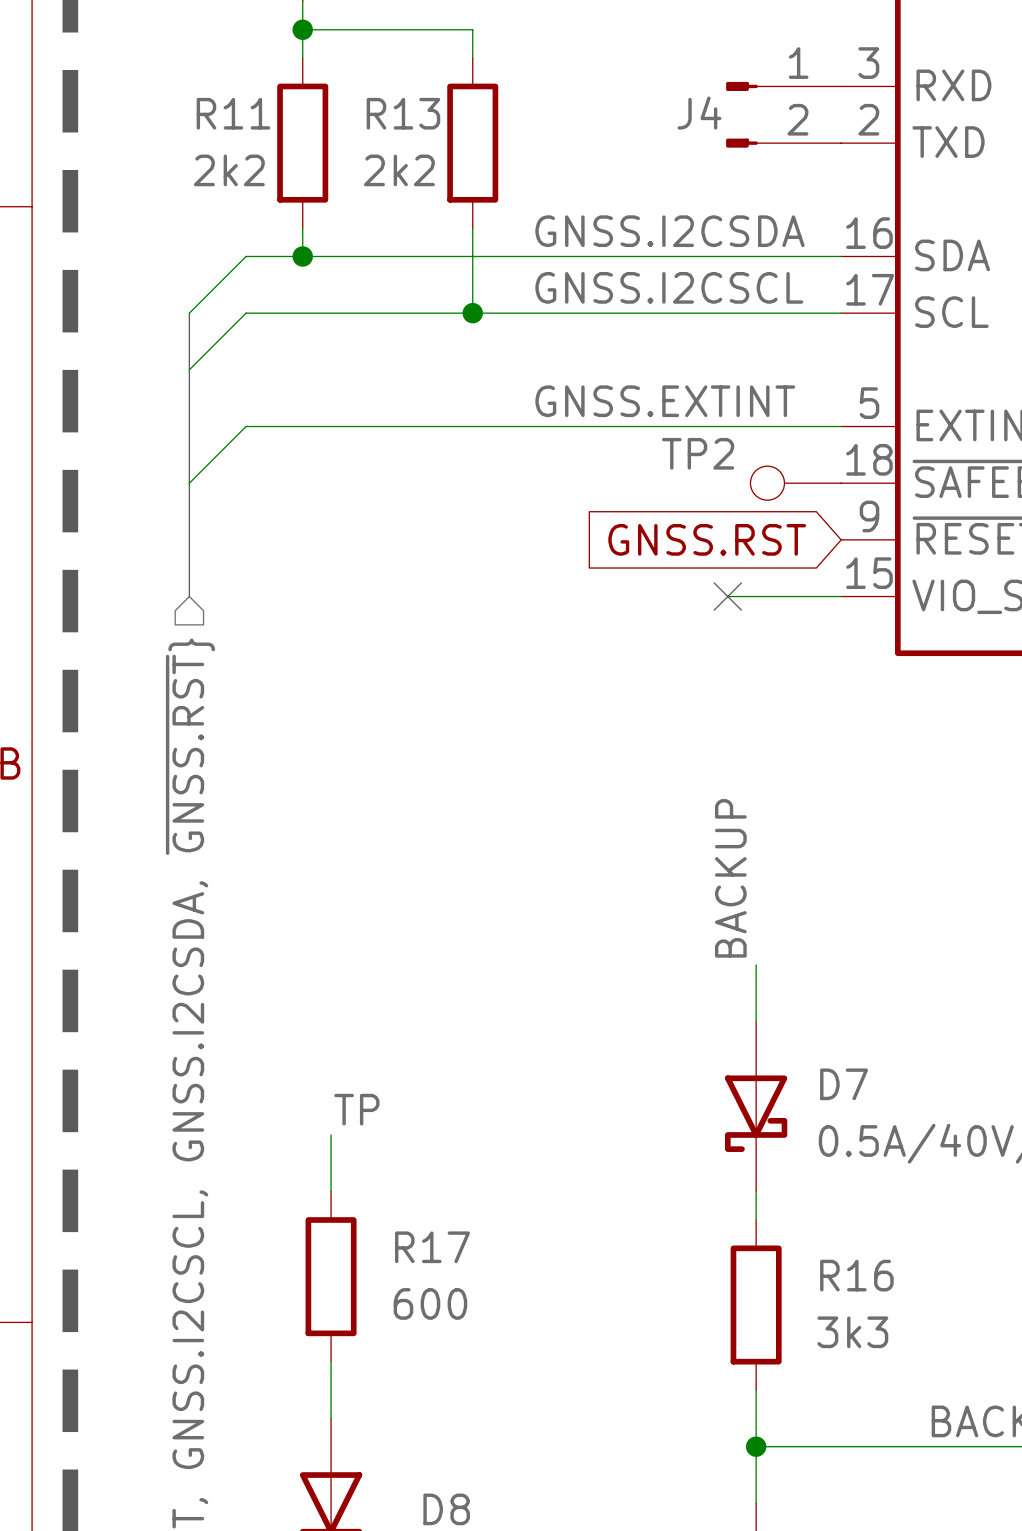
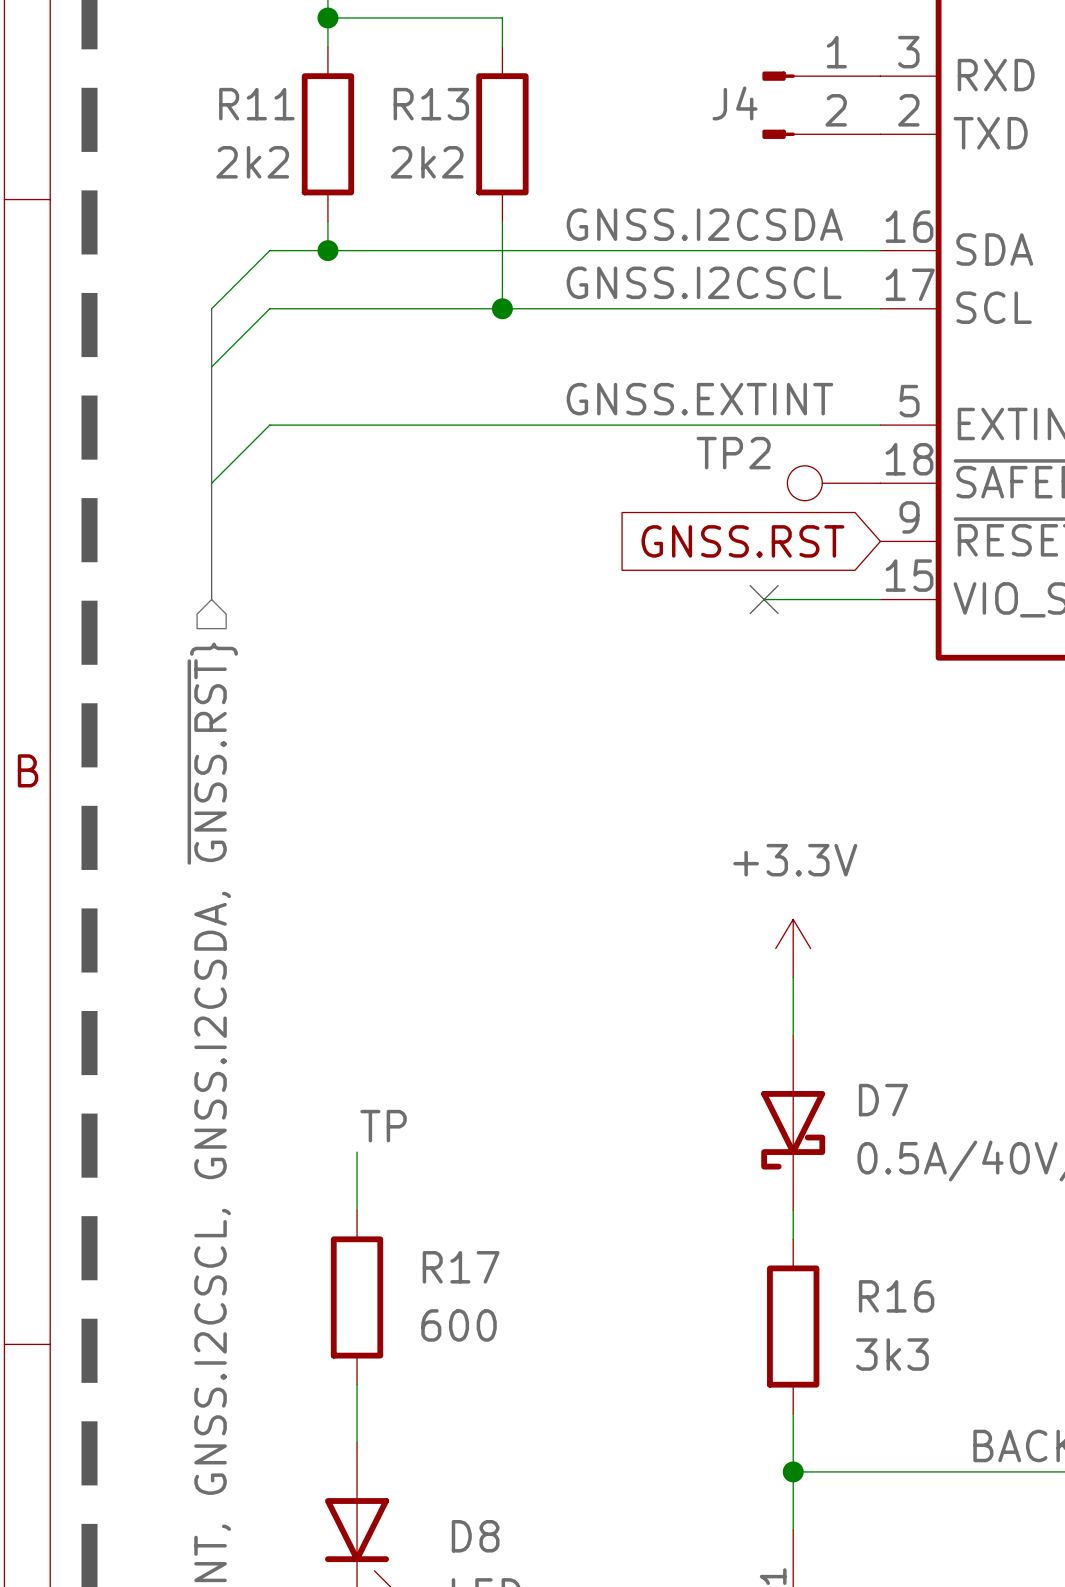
label: BACKUP (730, 878) -> none
power symbol: none -> +3.3V (793, 948)

